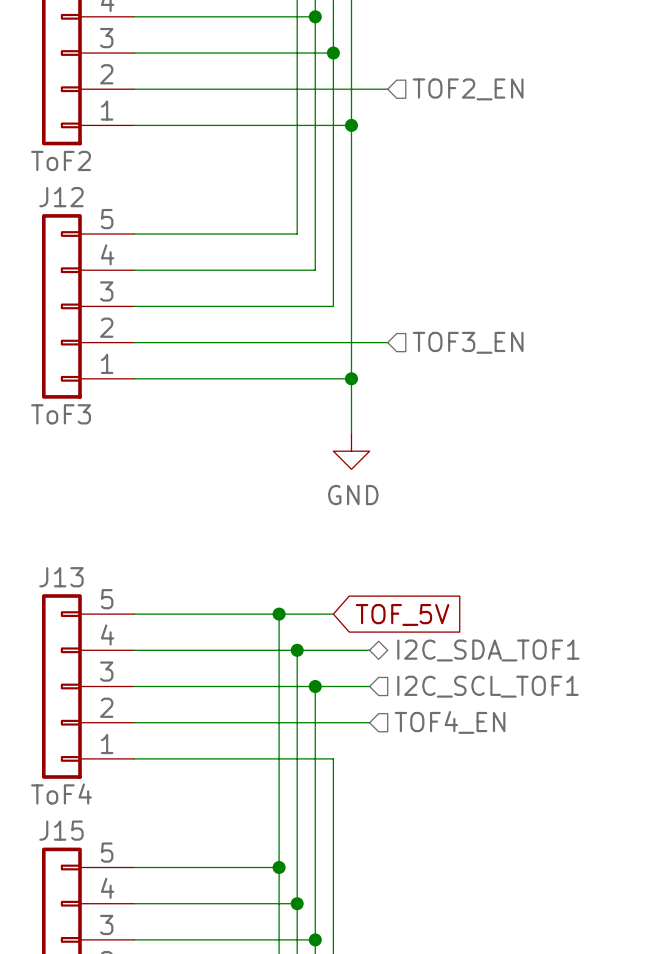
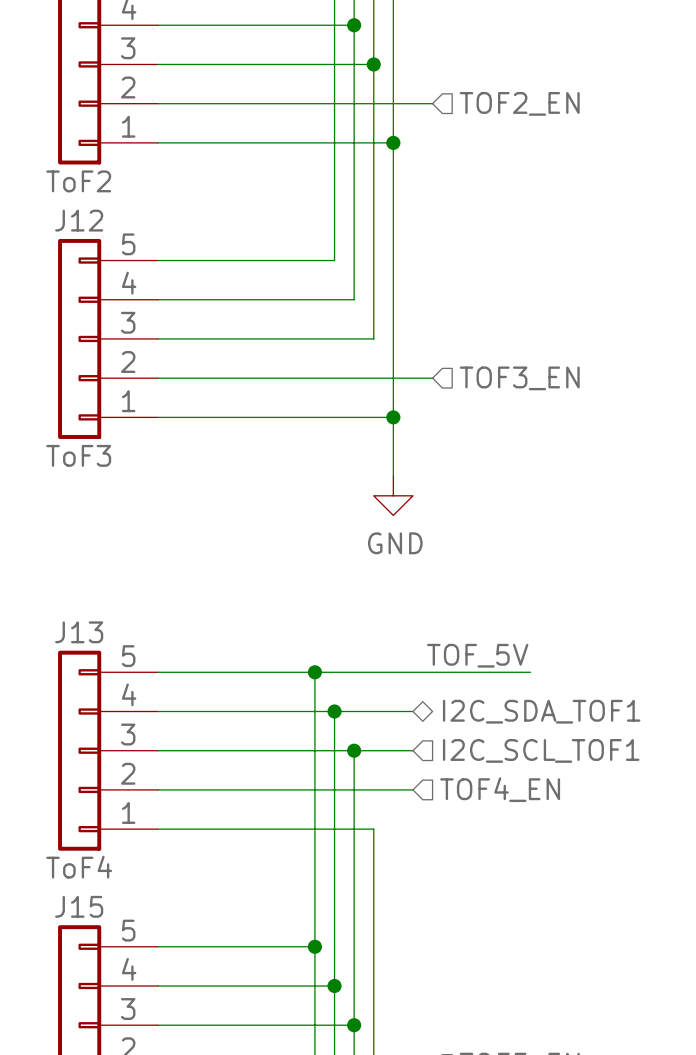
label: none -> TOF_5V (477, 655)
wire: none -> (373, 672) (530, 672)
global label: TOF_5V (402, 614) -> none

